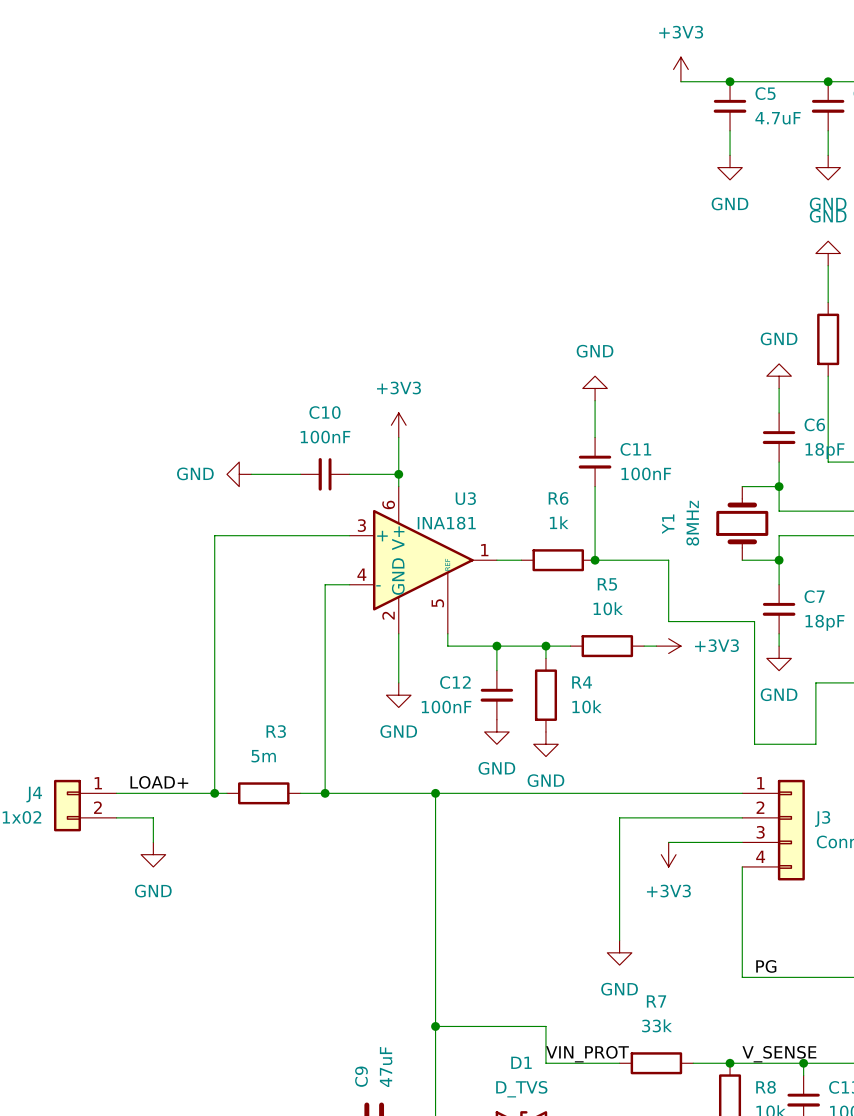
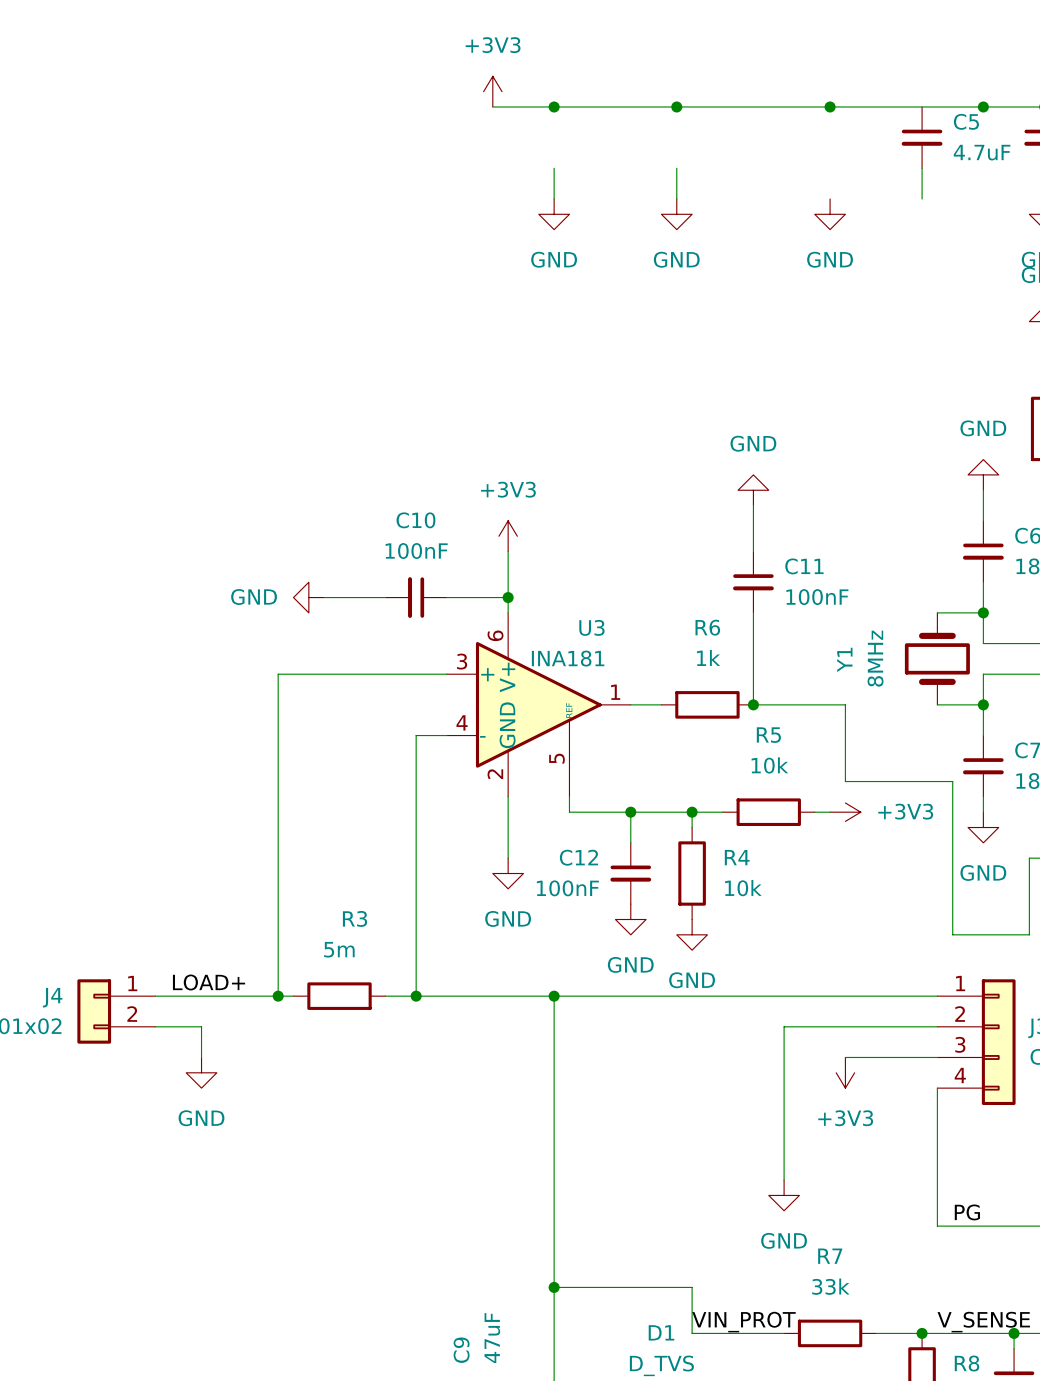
power symbol: none -> +3V3 (492, 91)
power symbol: +3V3 (680, 69) -> none
wire: none -> (492, 106) (860, 106)
junction: none -> (554, 106)
junction: none -> (676, 106)
junction: none -> (830, 106)
junction: (730, 81) -> none
junction: none -> (983, 106)
wire: none -> (554, 168) (554, 198)
wire: none -> (676, 168) (676, 198)
power symbol: none -> GND (554, 214)
power symbol: none -> GND (676, 214)
power symbol position: GND (730, 167) -> GND (830, 214)

